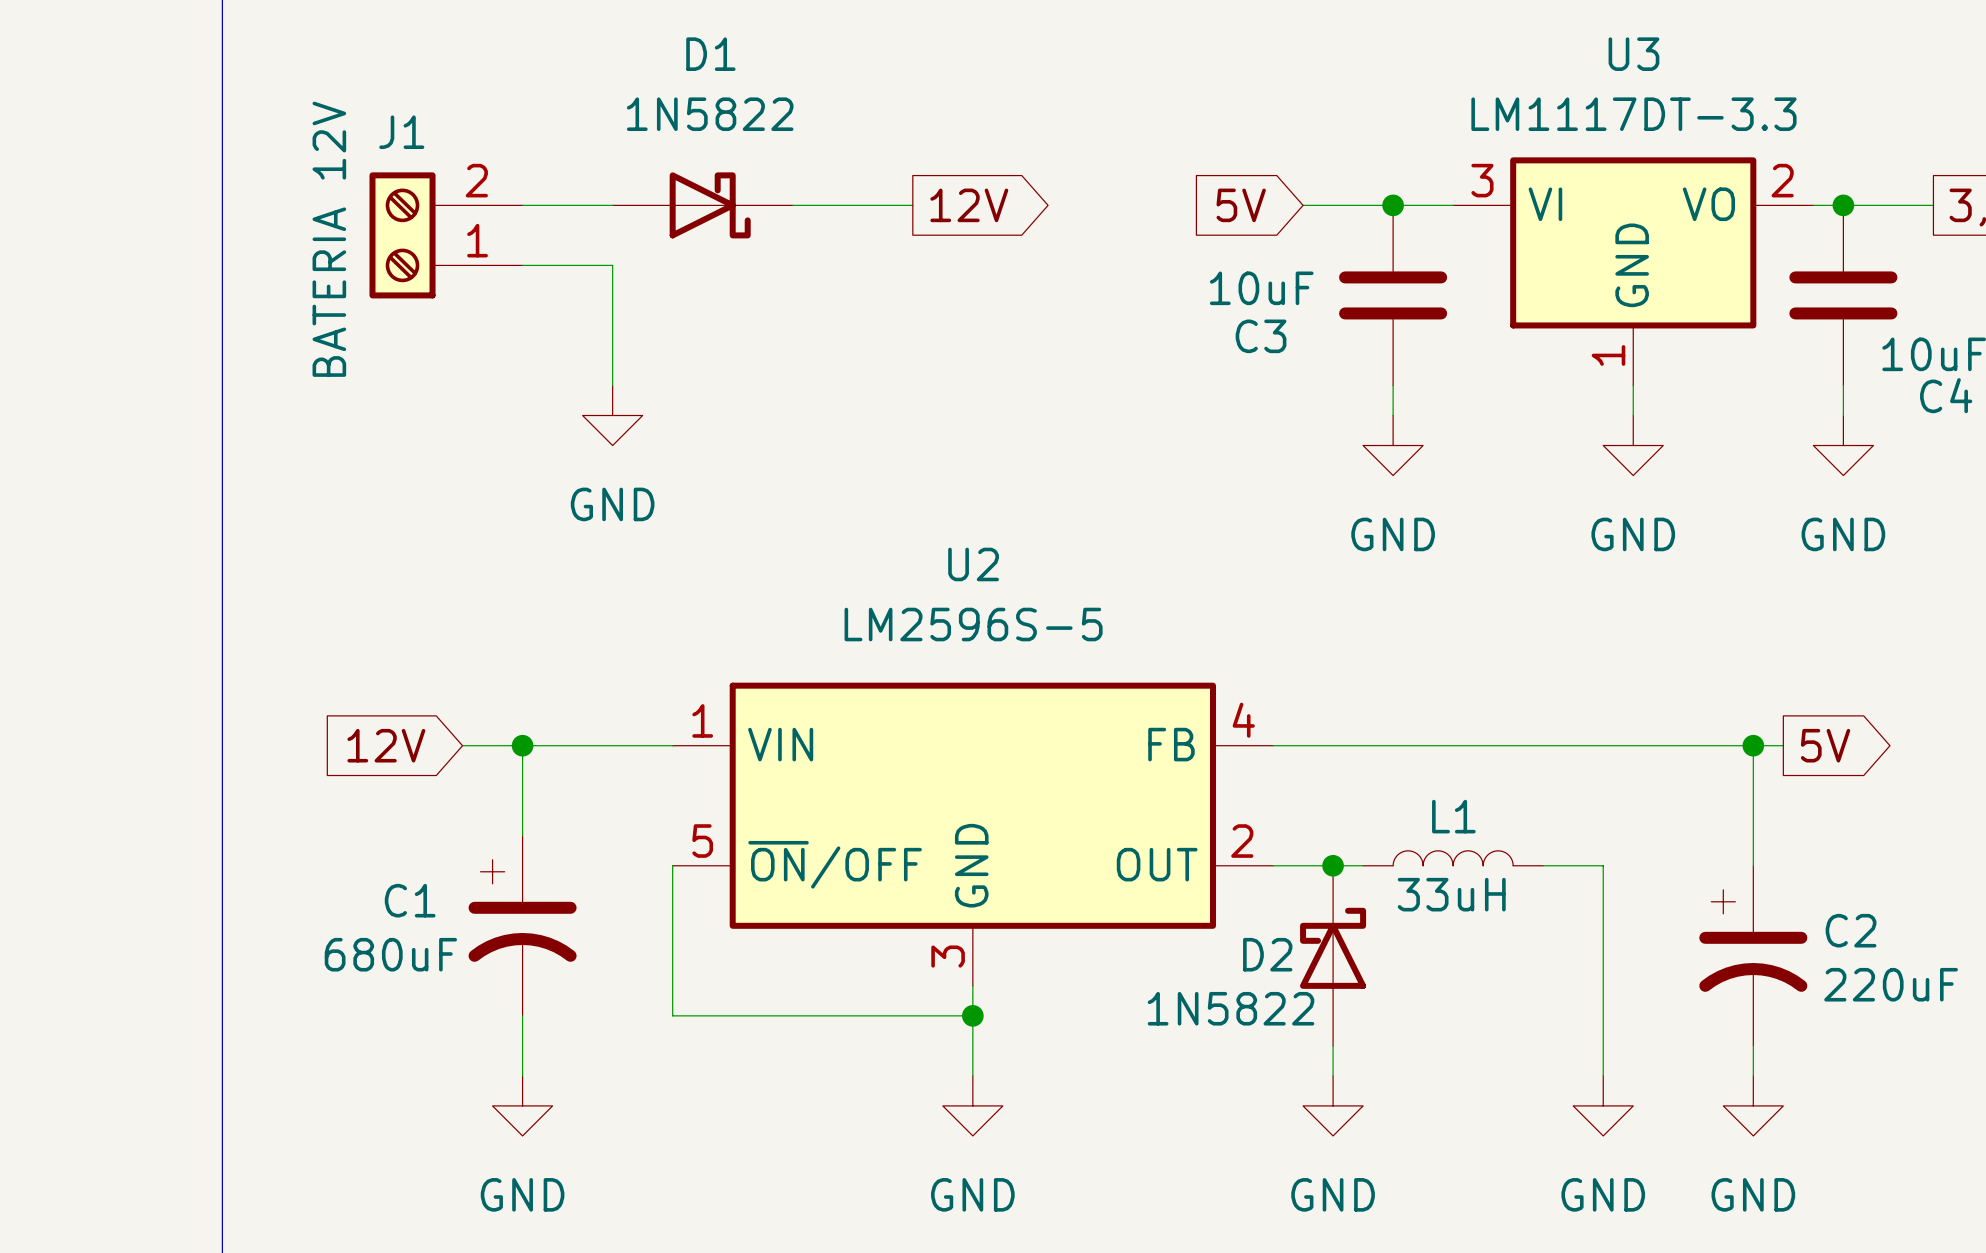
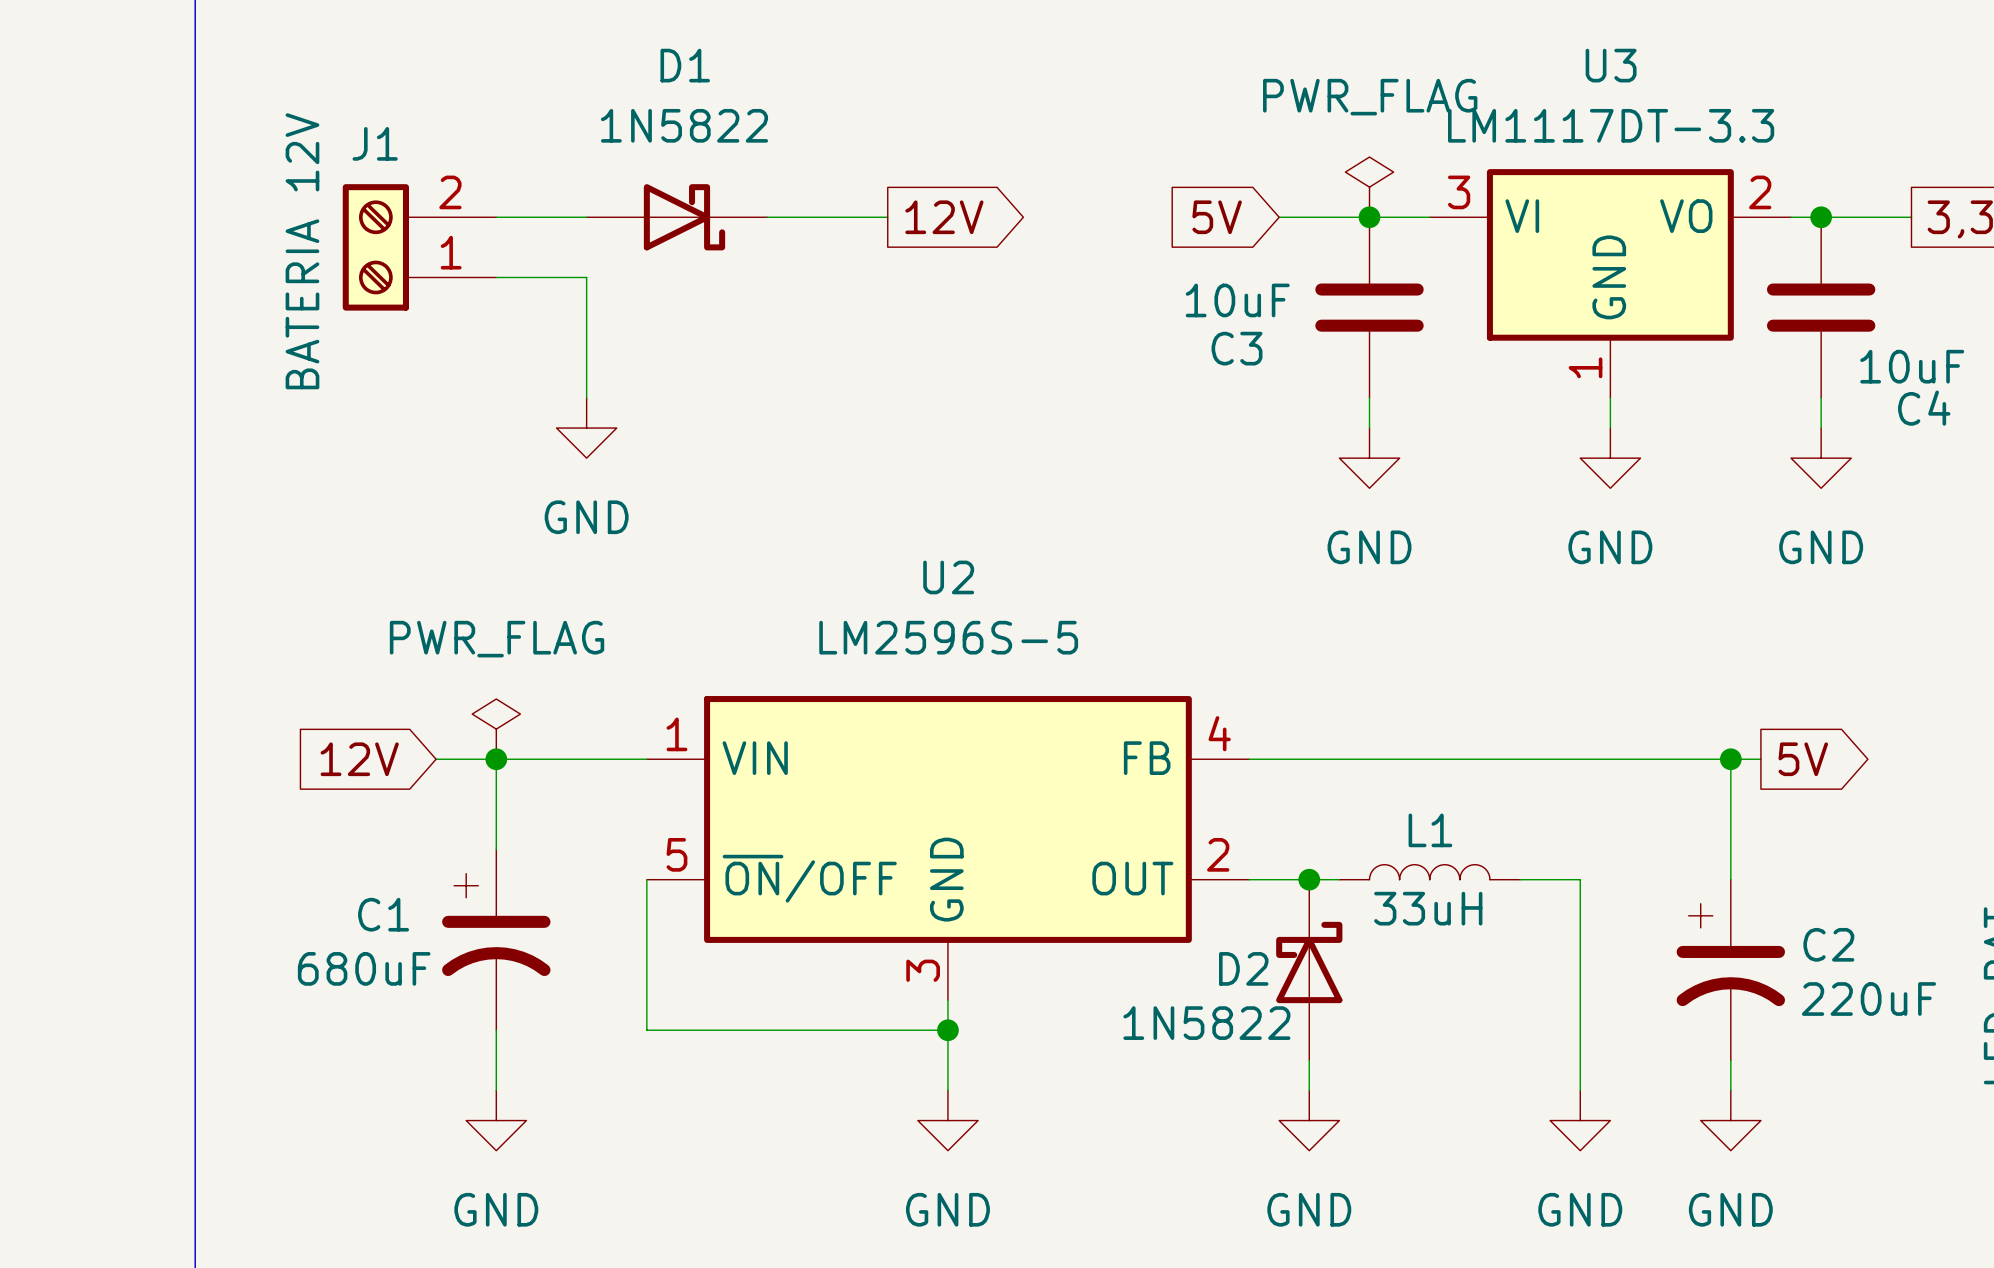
power symbol: none -> PWR_FLAG (1369, 187)
power symbol: none -> PWR_FLAG (496, 729)

